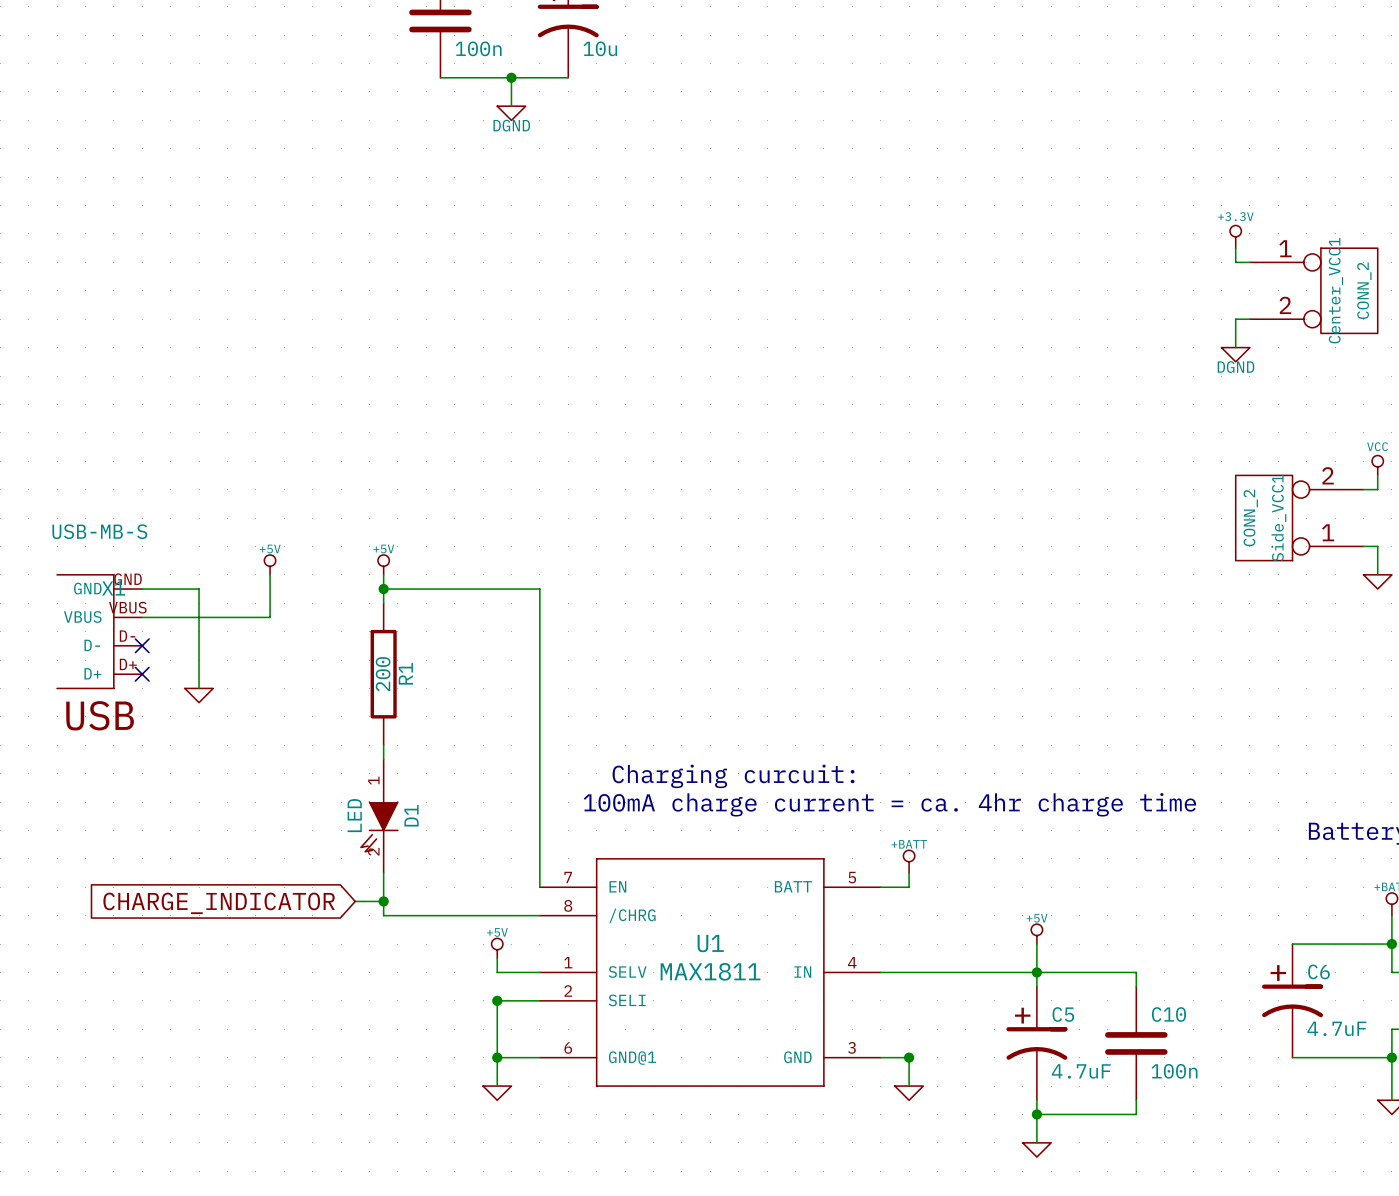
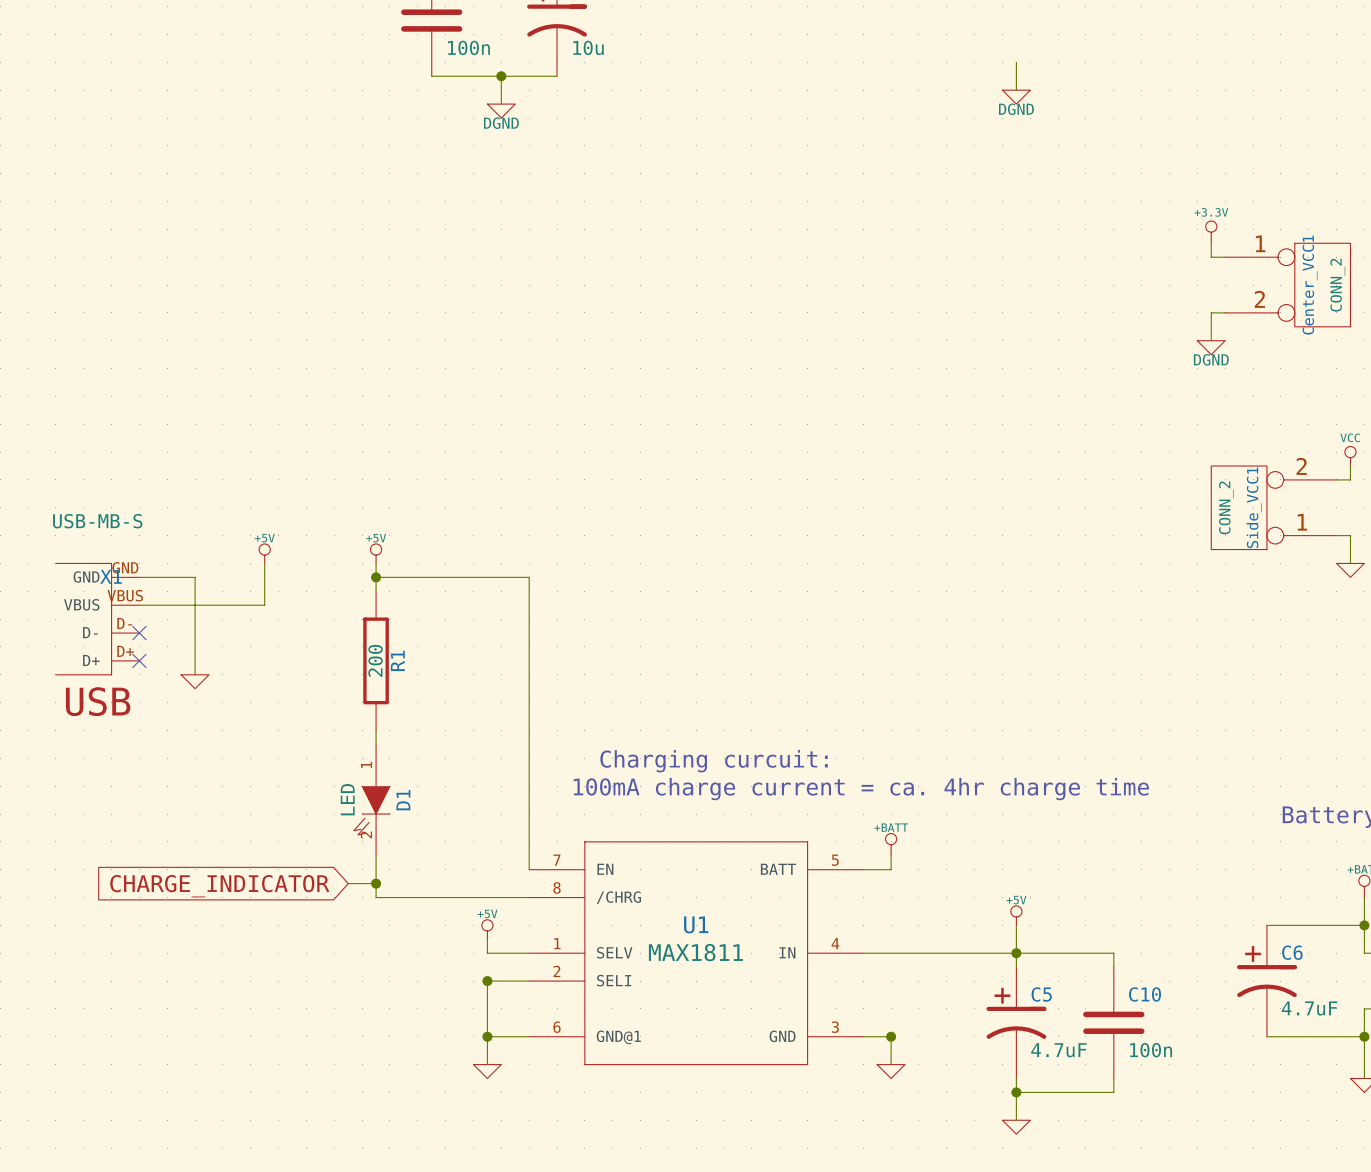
wire: none -> (1016, 62) (1016, 90)
power symbol: none -> DGND (1016, 97)

